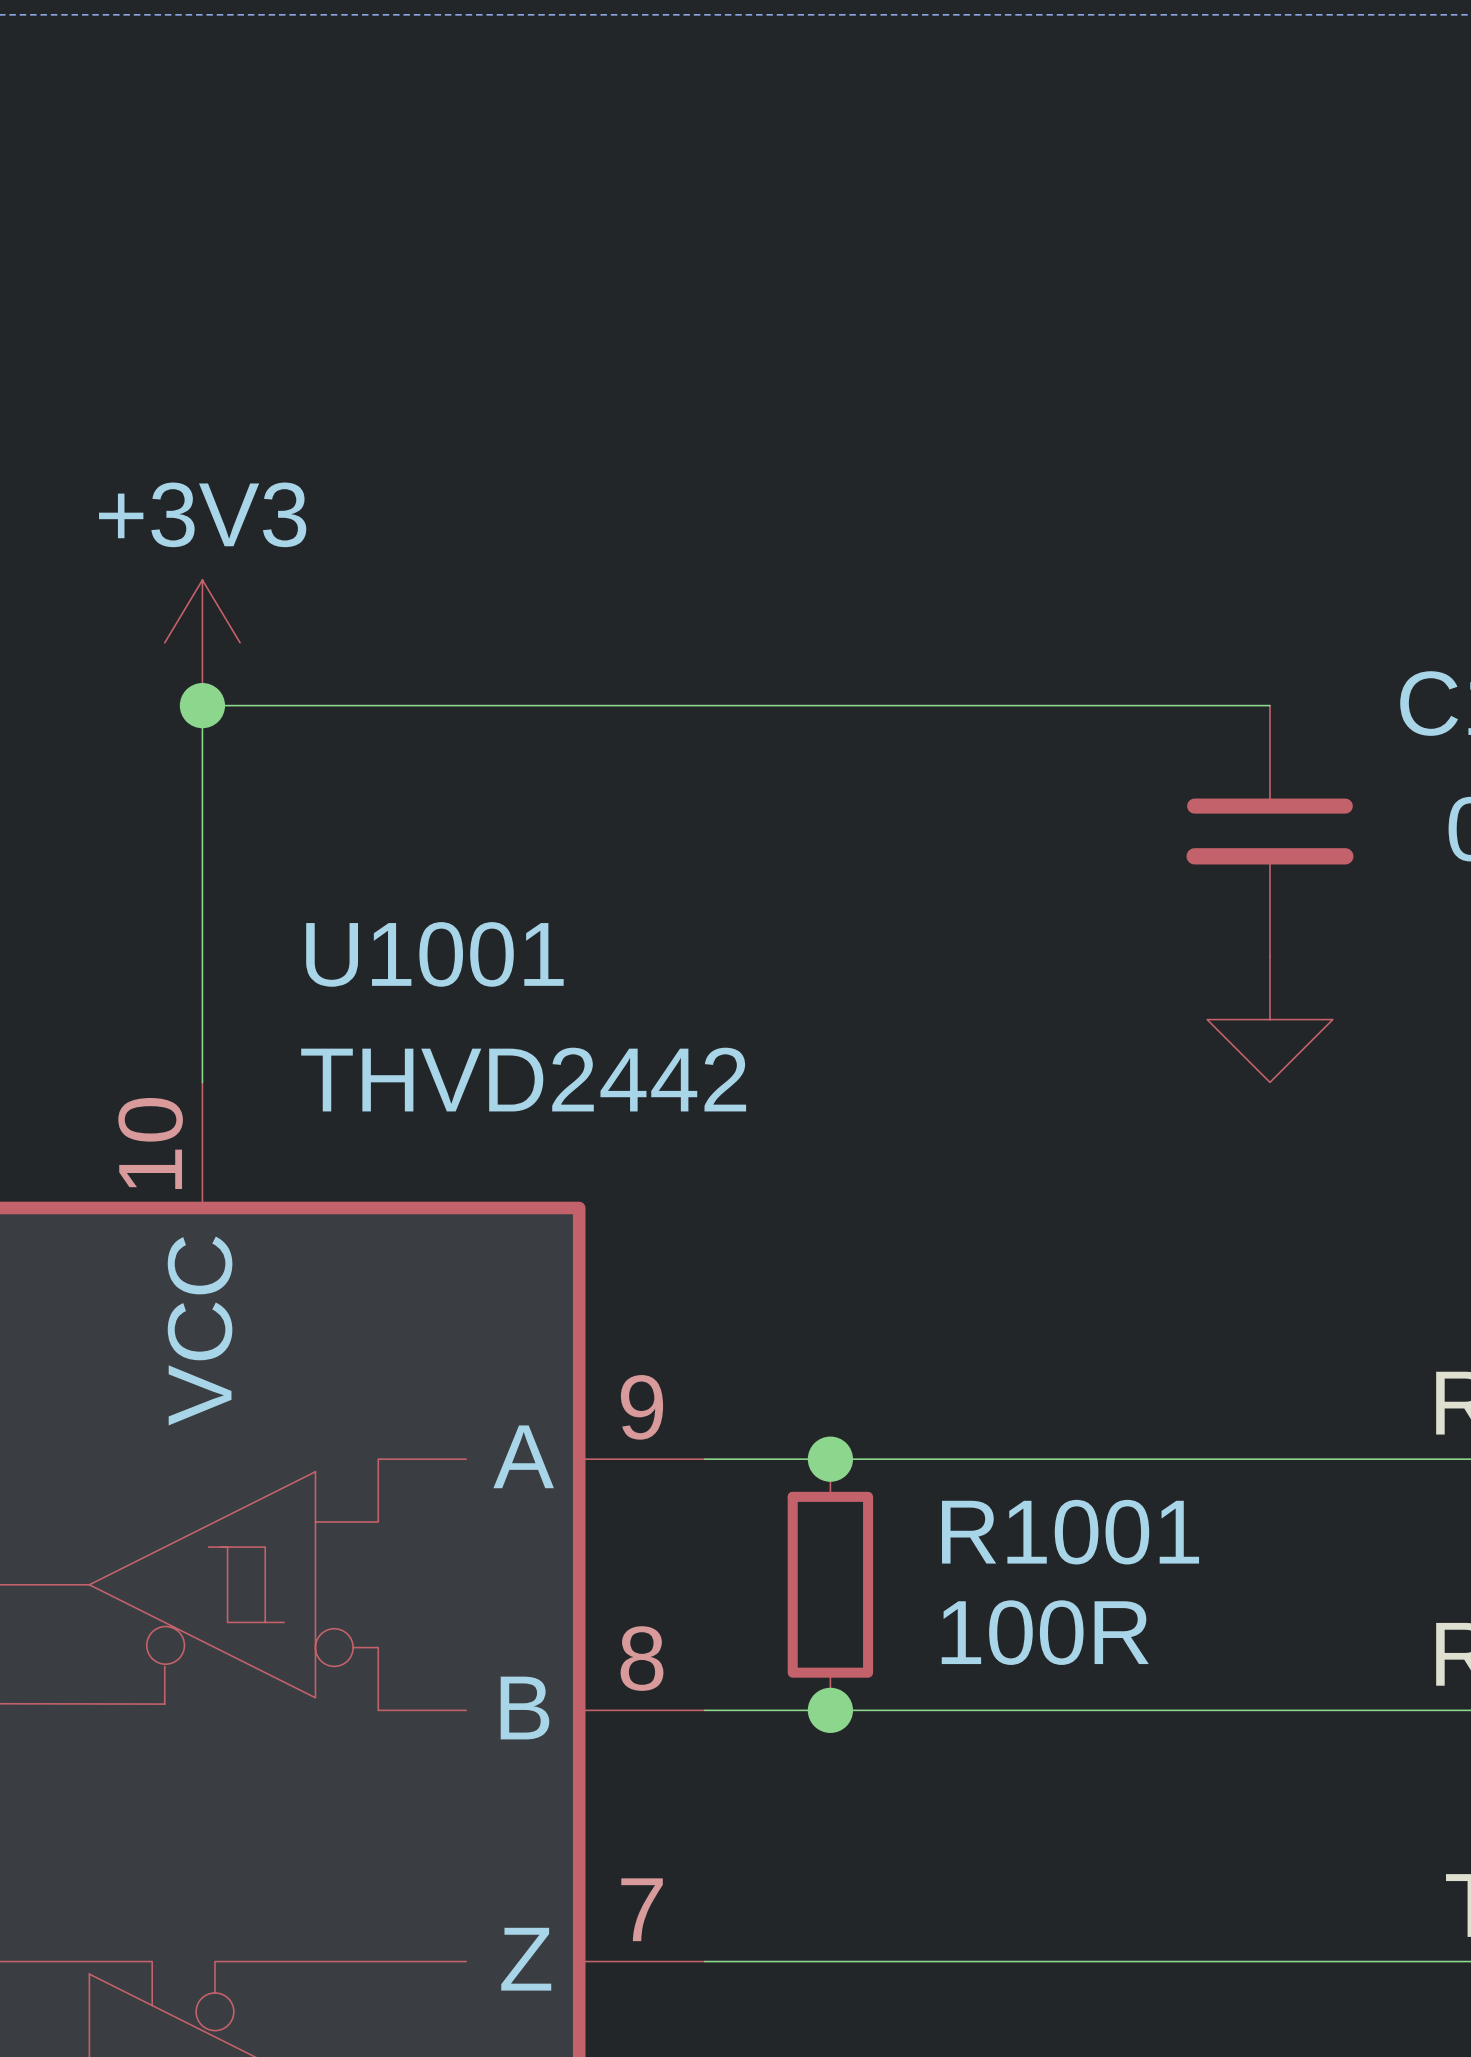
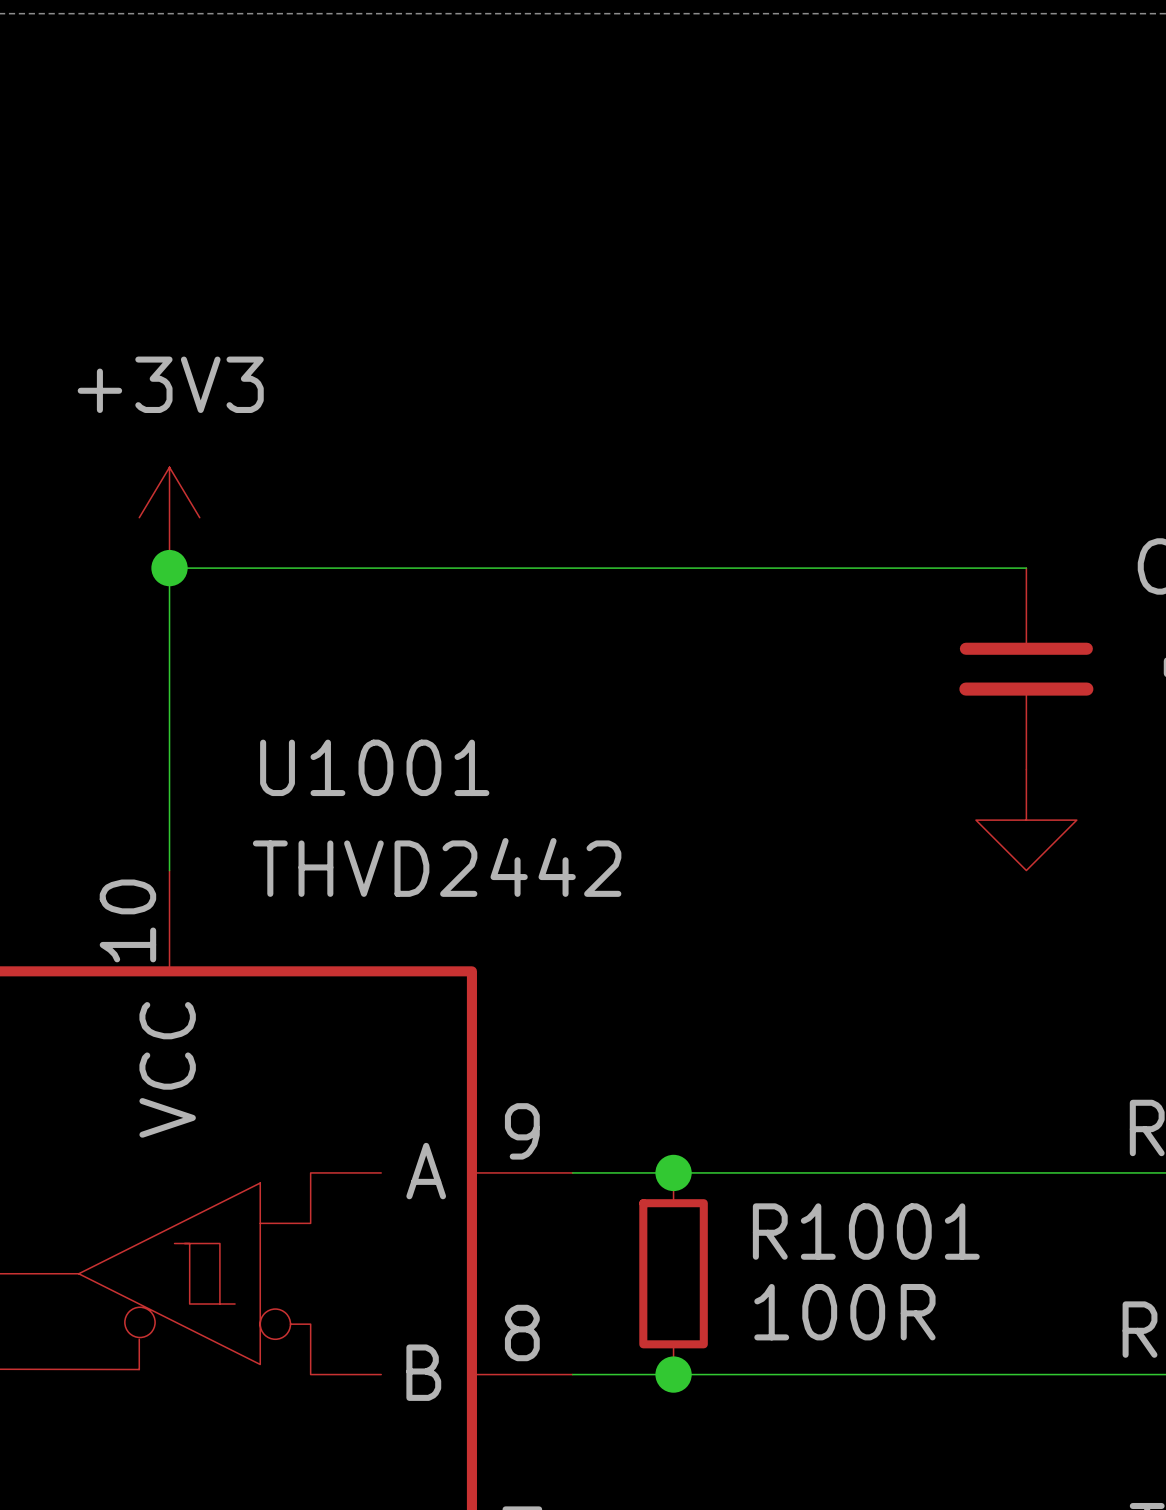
power symbol text position: +3V3 (202, 514) -> +3V3 (170, 384)

